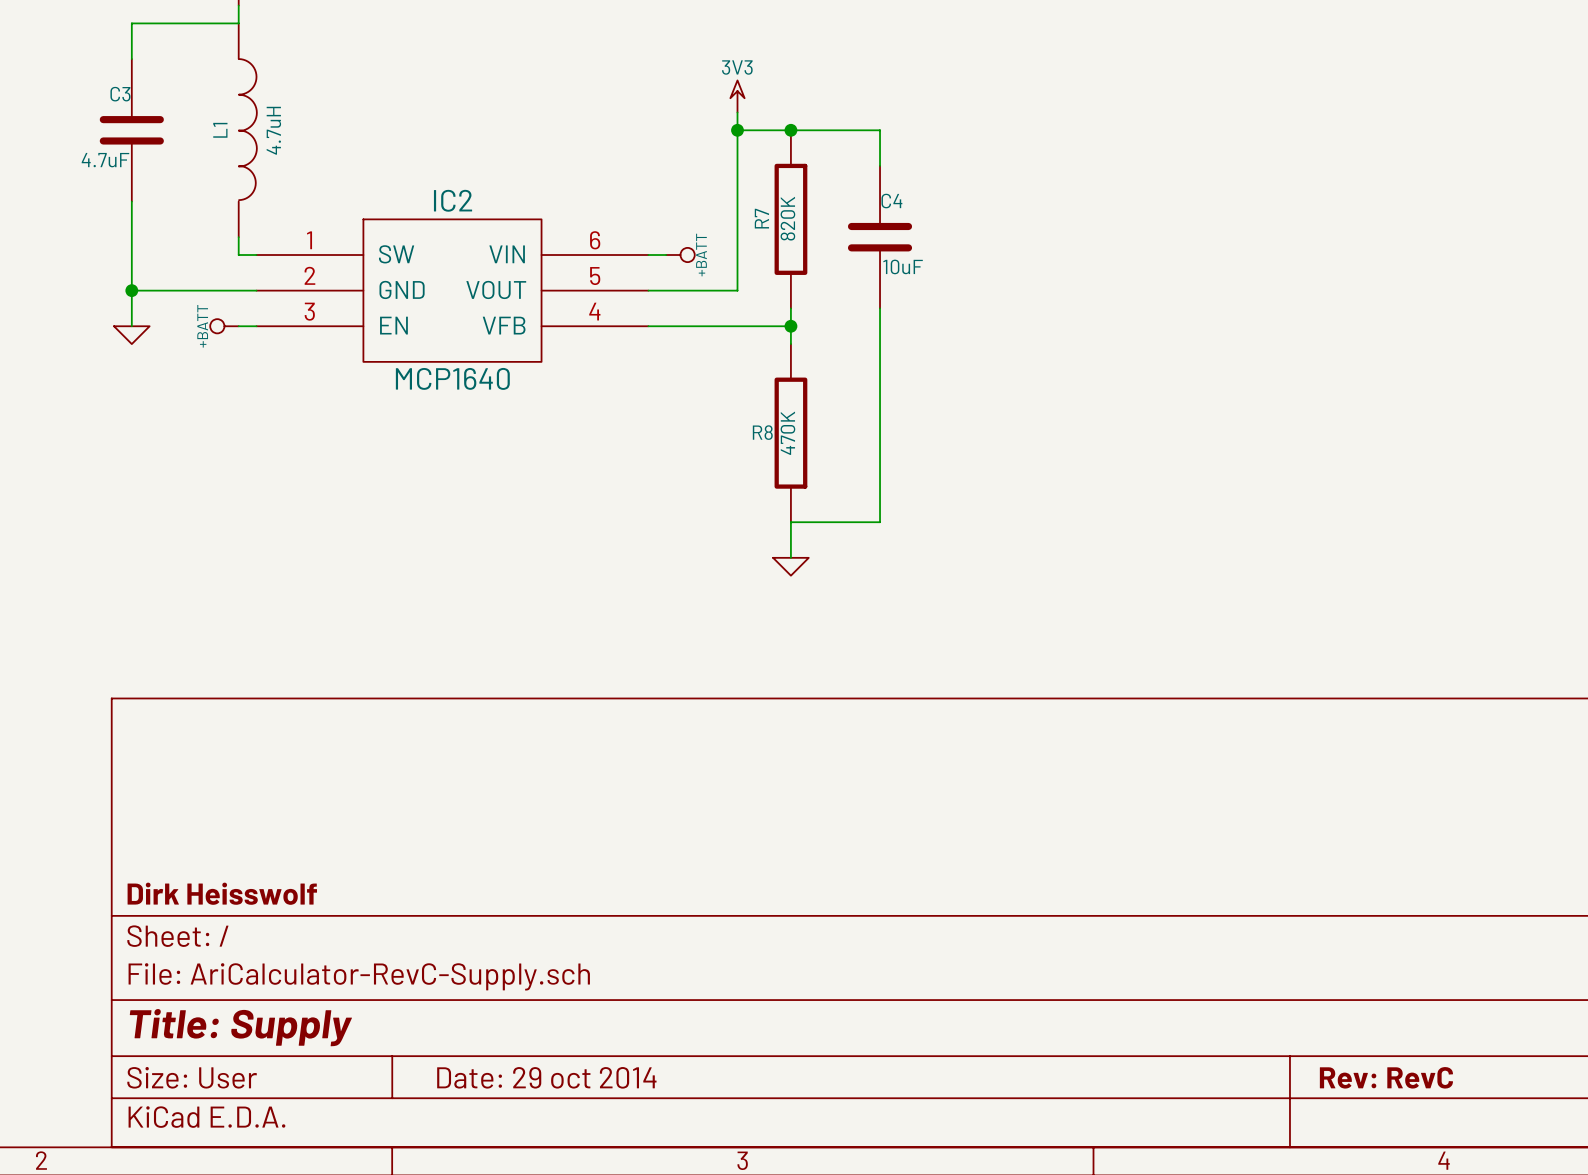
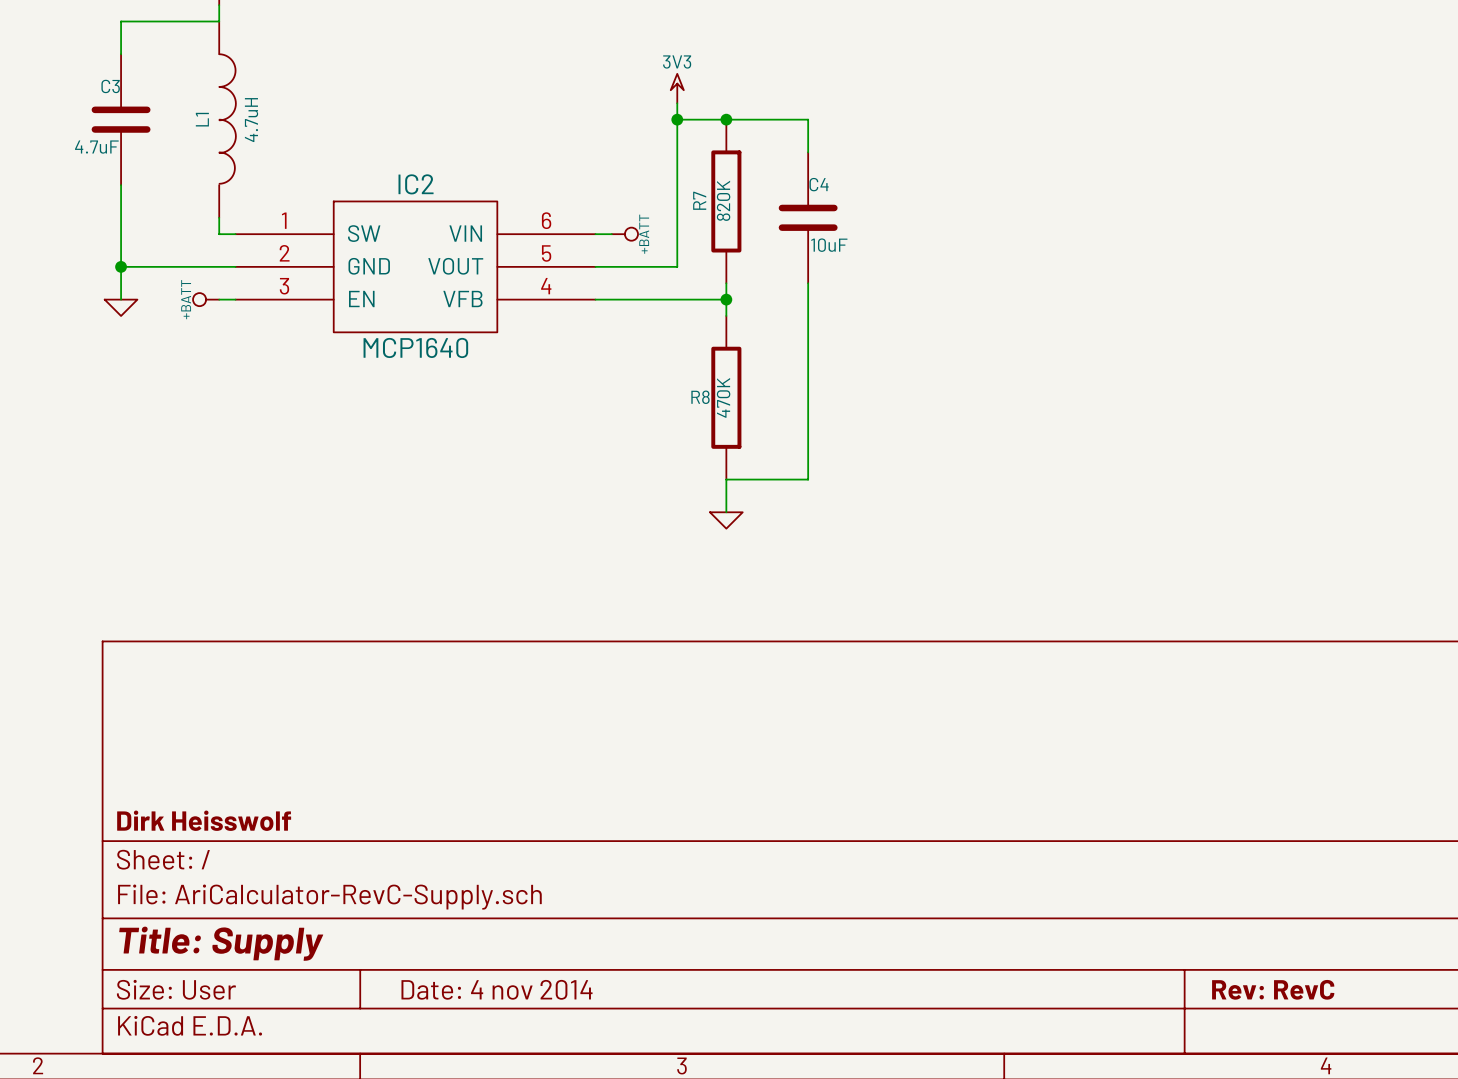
title block: Date: 29 oct 2014 (546, 1077) -> Date: 4 nov 2014 (497, 989)

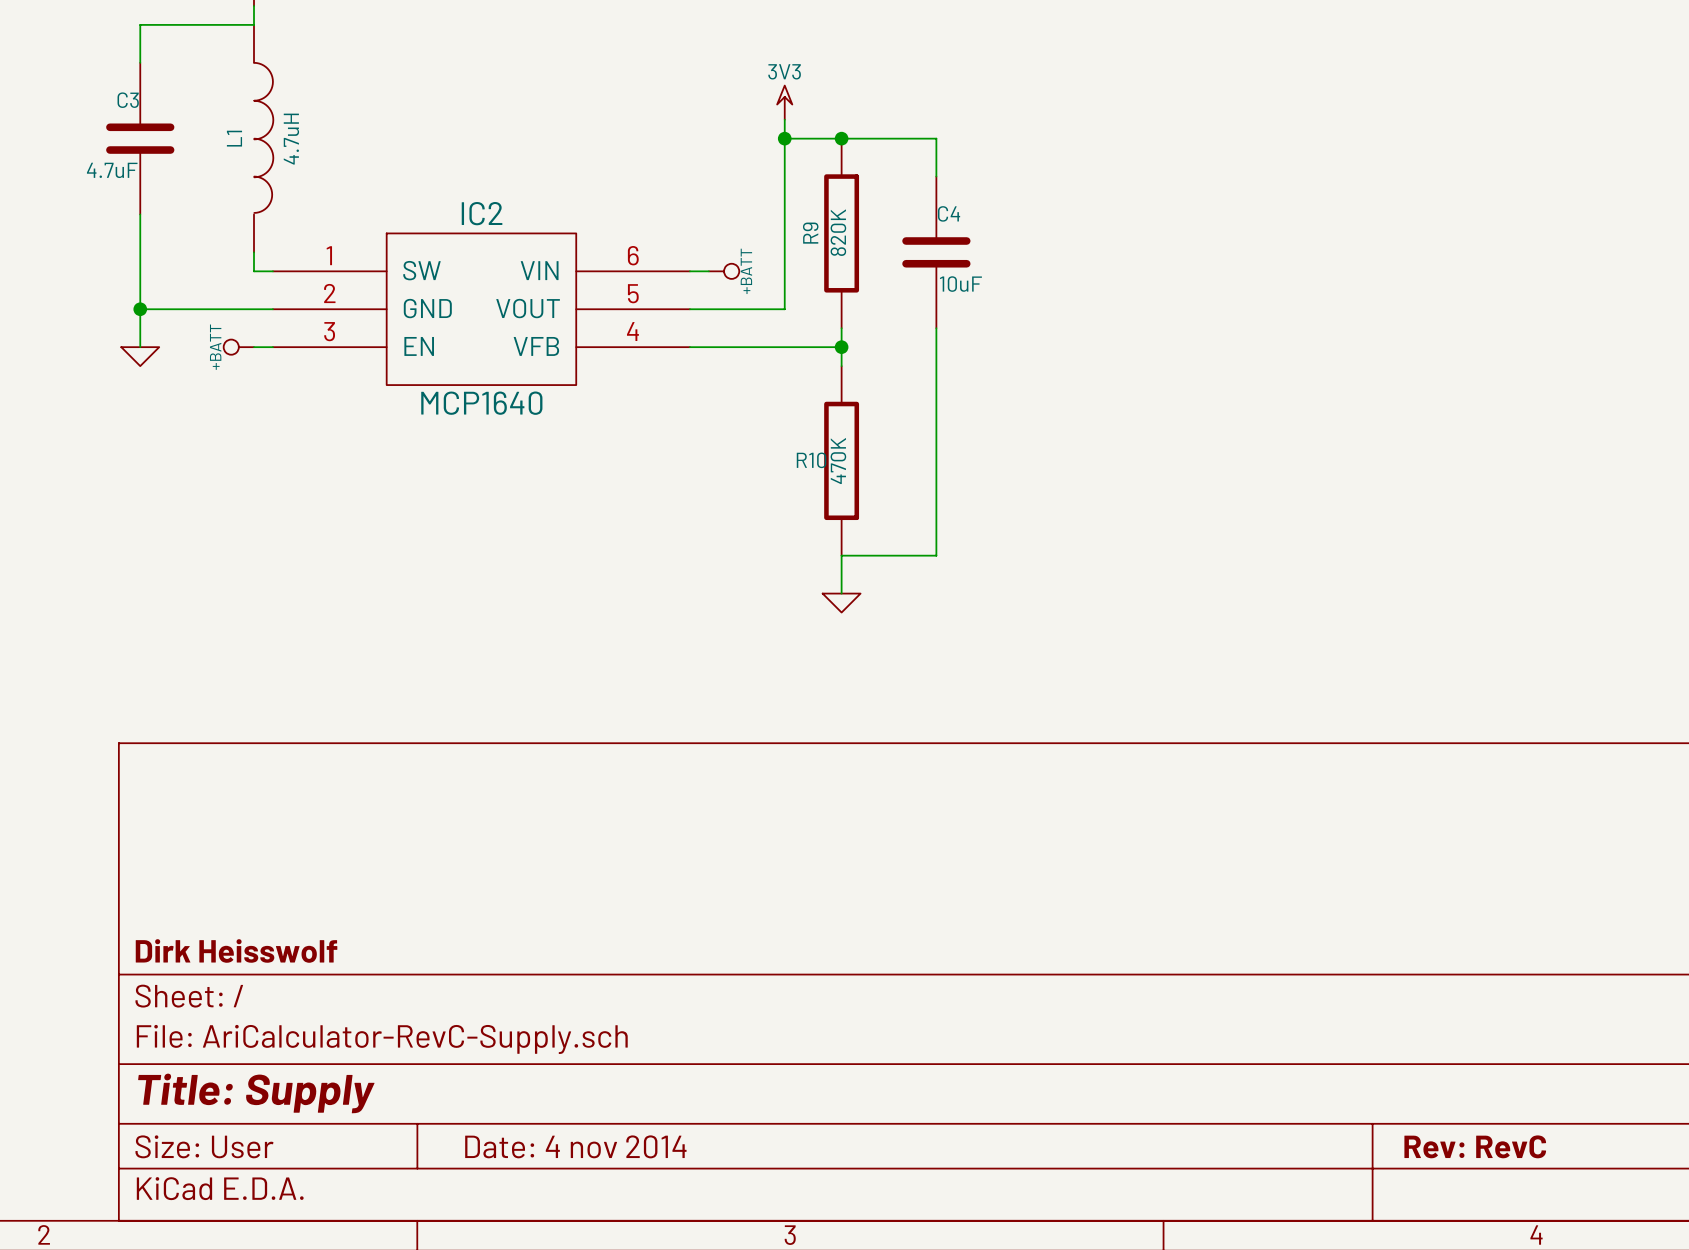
R7 name: R7 (699, 200) -> R9 (810, 233)
R8 name: R8 (700, 397) -> R10 (811, 460)

